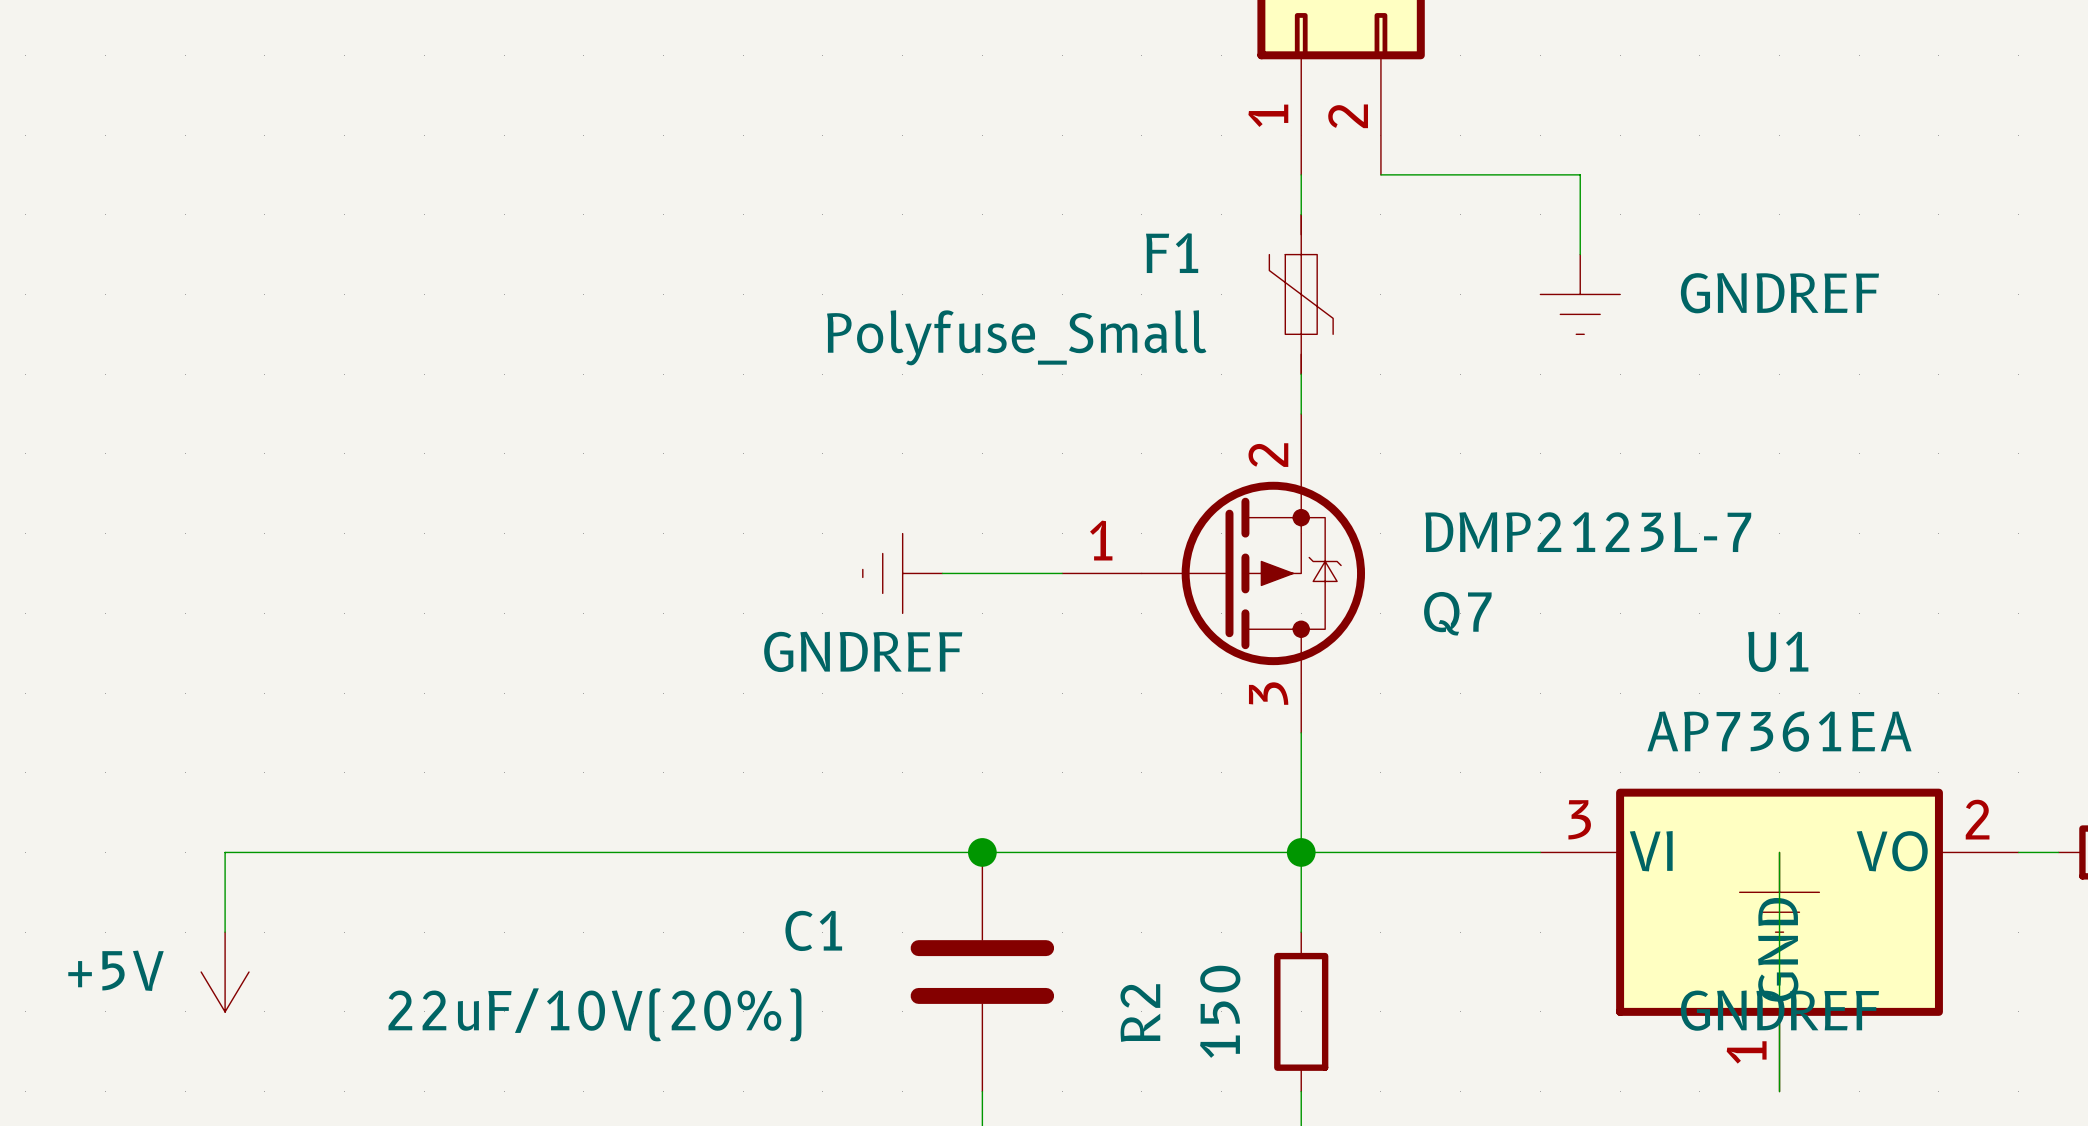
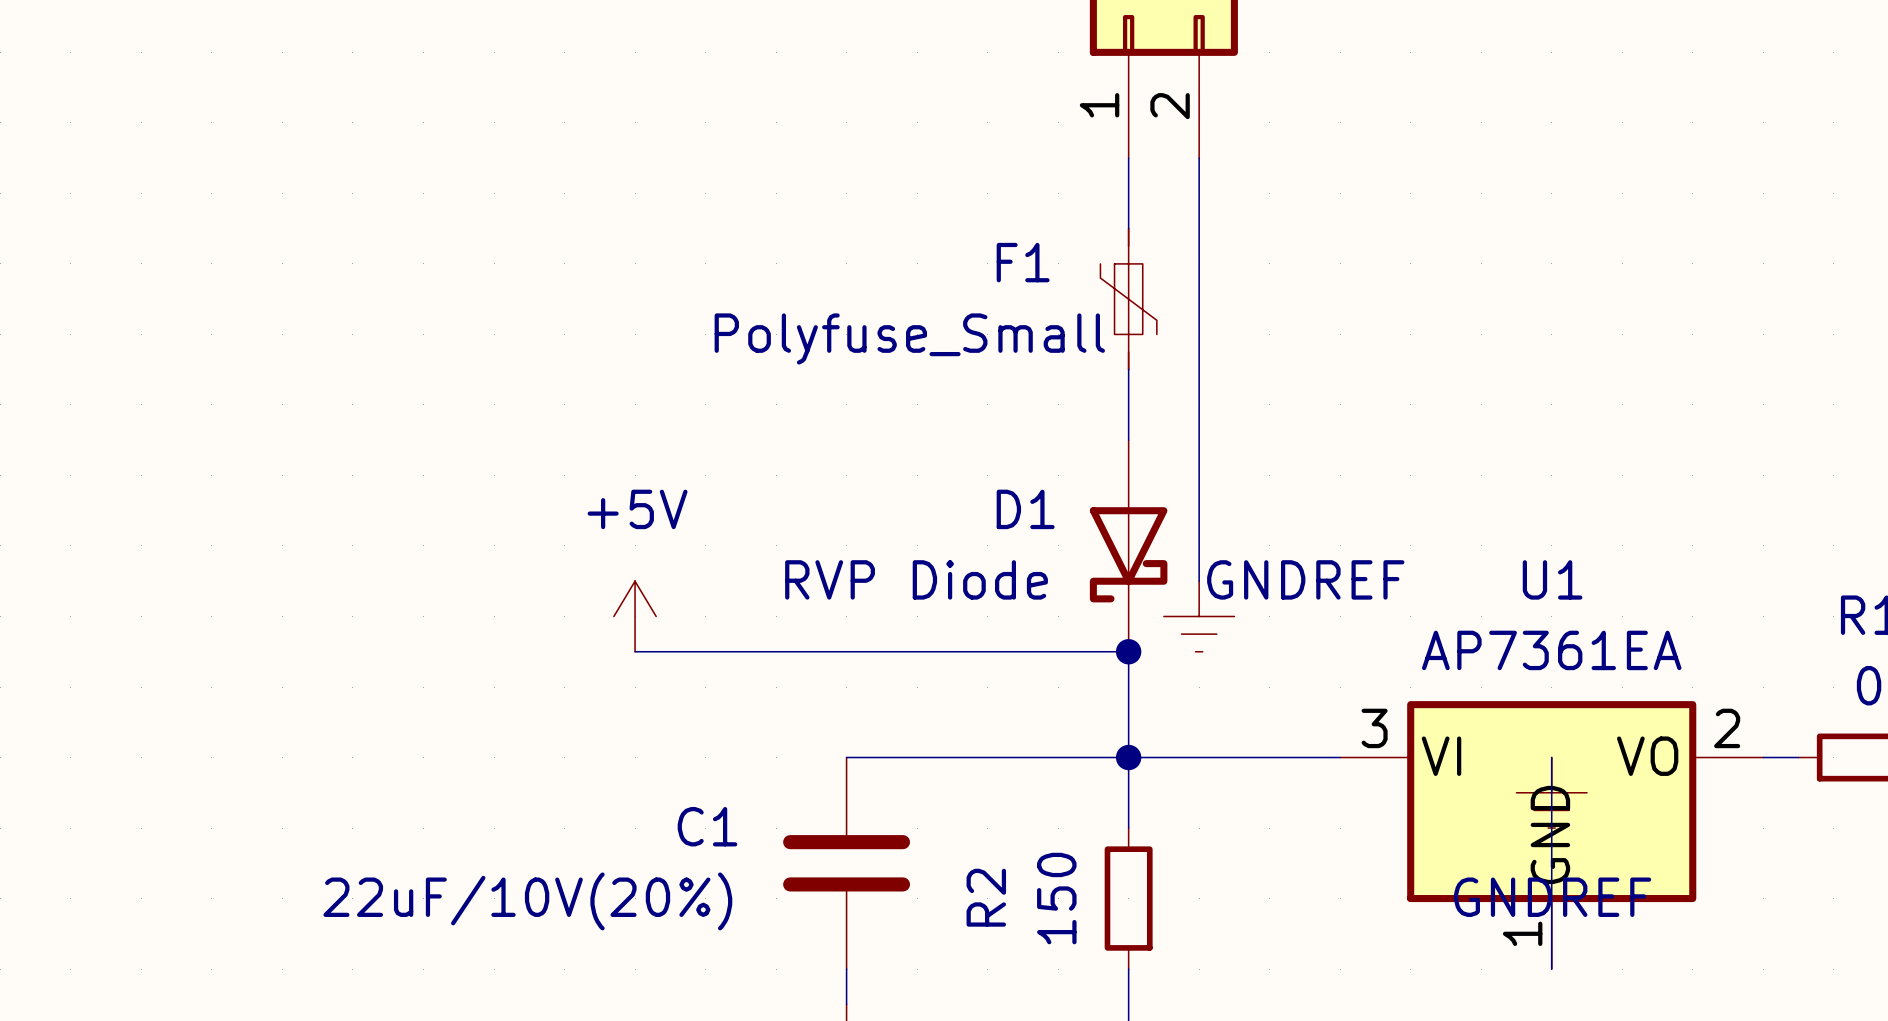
wire: (1380, 174) (1580, 174) (1580, 254) -> (1199, 158) (1199, 581)
F1 position: (1301, 294) -> (1128, 299)
power symbol: GNDREF (1580, 294) -> none
power symbol: GNDREF (902, 573) -> none
wire: (942, 573) (1062, 573) -> none
Q7: DMP2123L-7 (1213, 573) -> none
D1: none -> RVP Diode (1128, 545)
power symbol: none -> GNDREF (1199, 616)
wire: none -> (635, 651) (1128, 651)
junction: none -> (1128, 651)
wire: (982, 852) (225, 852) (225, 932) -> none
junction: (982, 852) -> none
power symbol text position: +5V (116, 970) -> +5V (637, 509)
power symbol rotation: 0° (225, 972) -> 180° (635, 616)
power symbol position: +5V (225, 972) -> +5V (635, 616)

